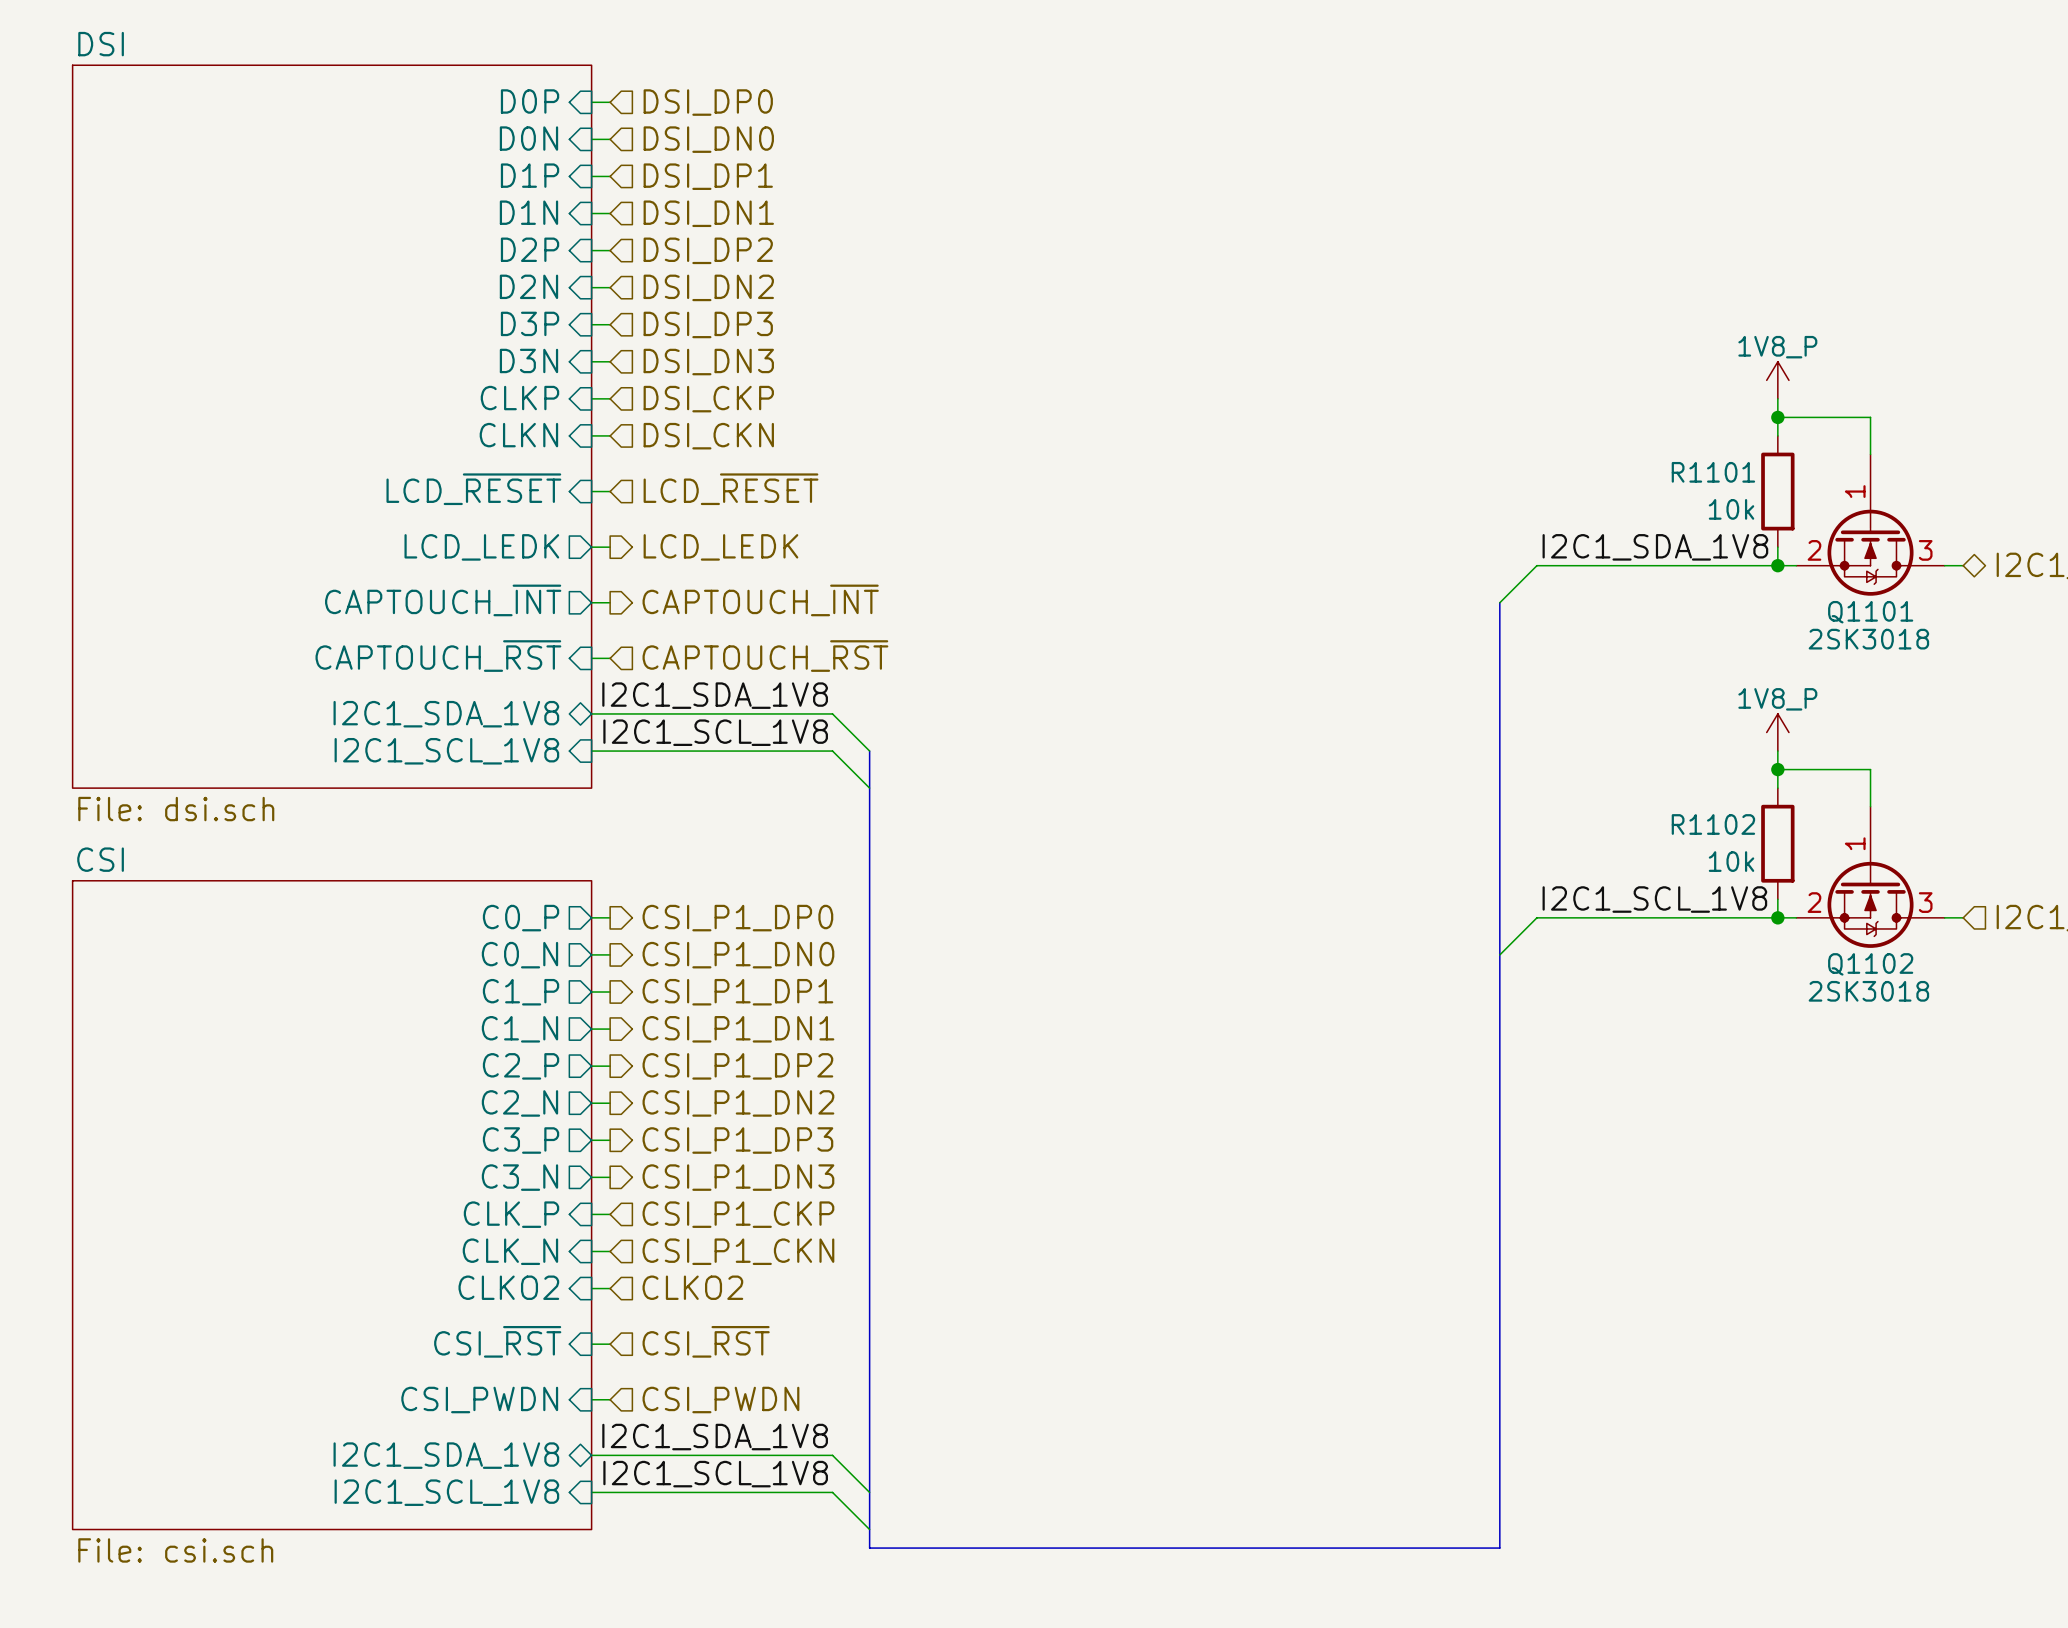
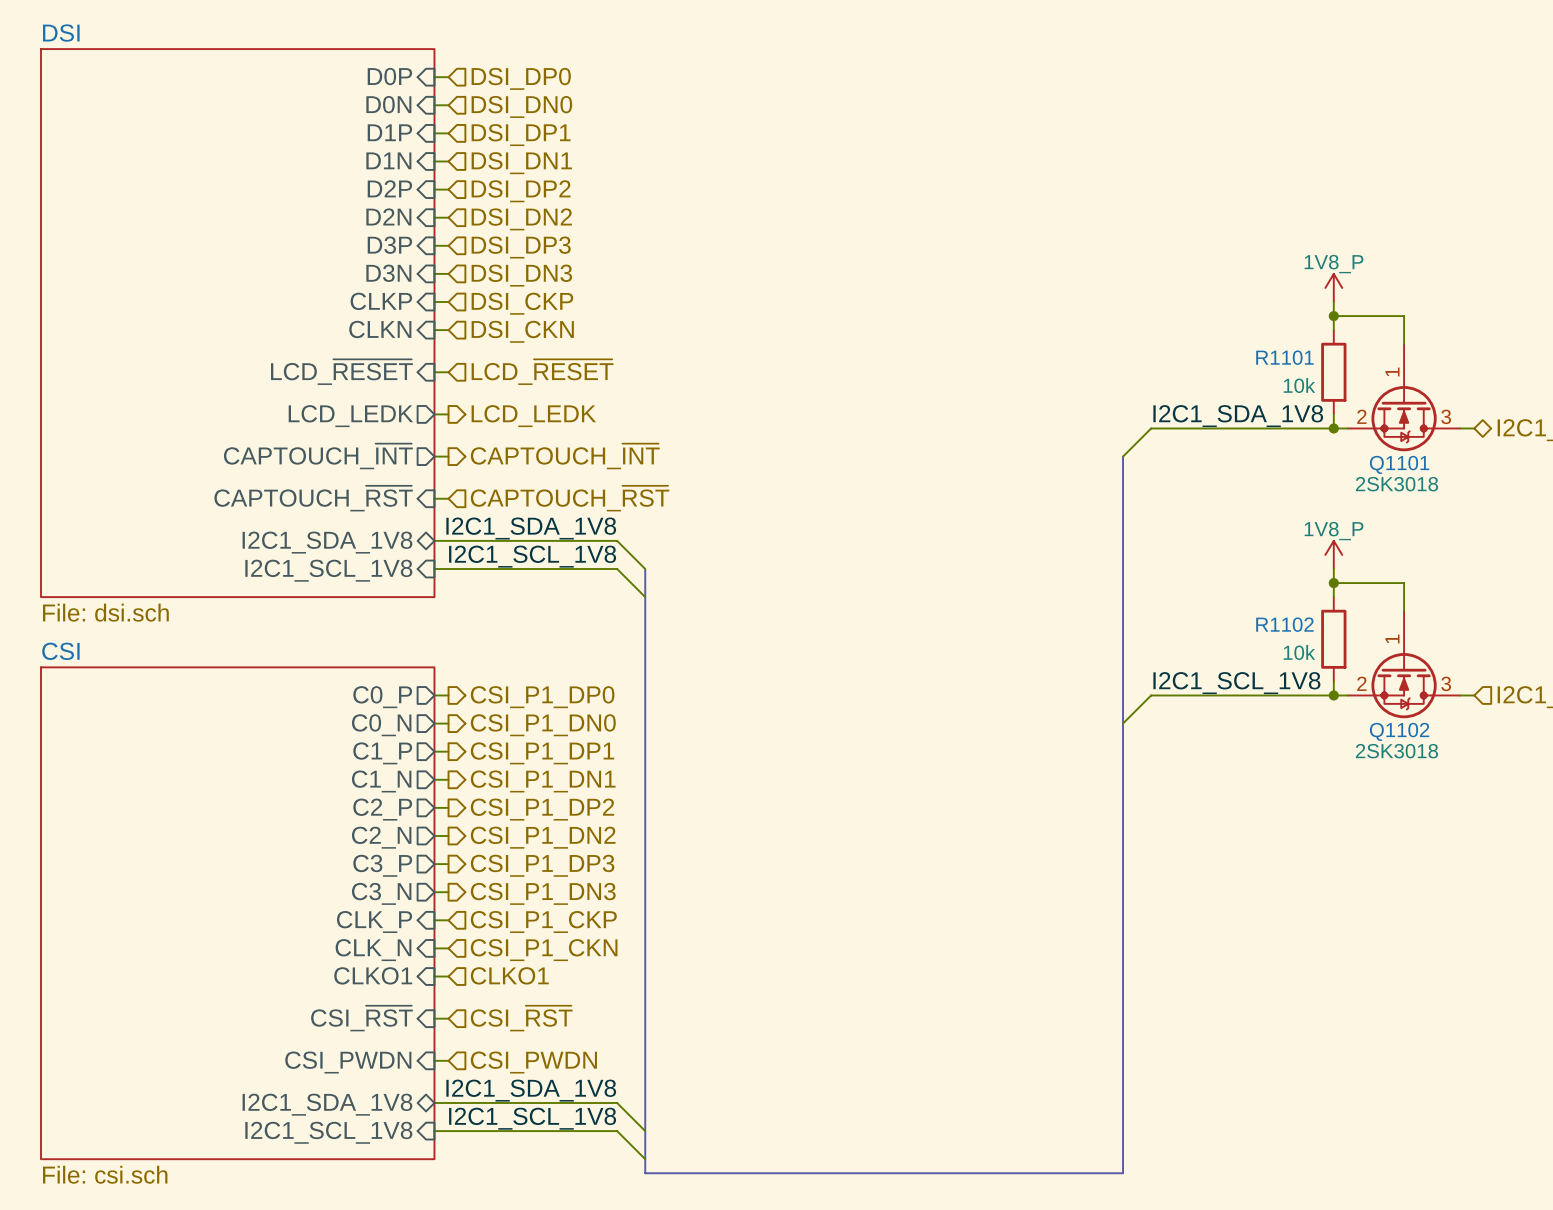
sheet pin: CLKO2 (508, 1287) -> CLKO1 (373, 975)
hierarchical label: CLKO2 (692, 1287) -> CLKO1 (509, 975)

